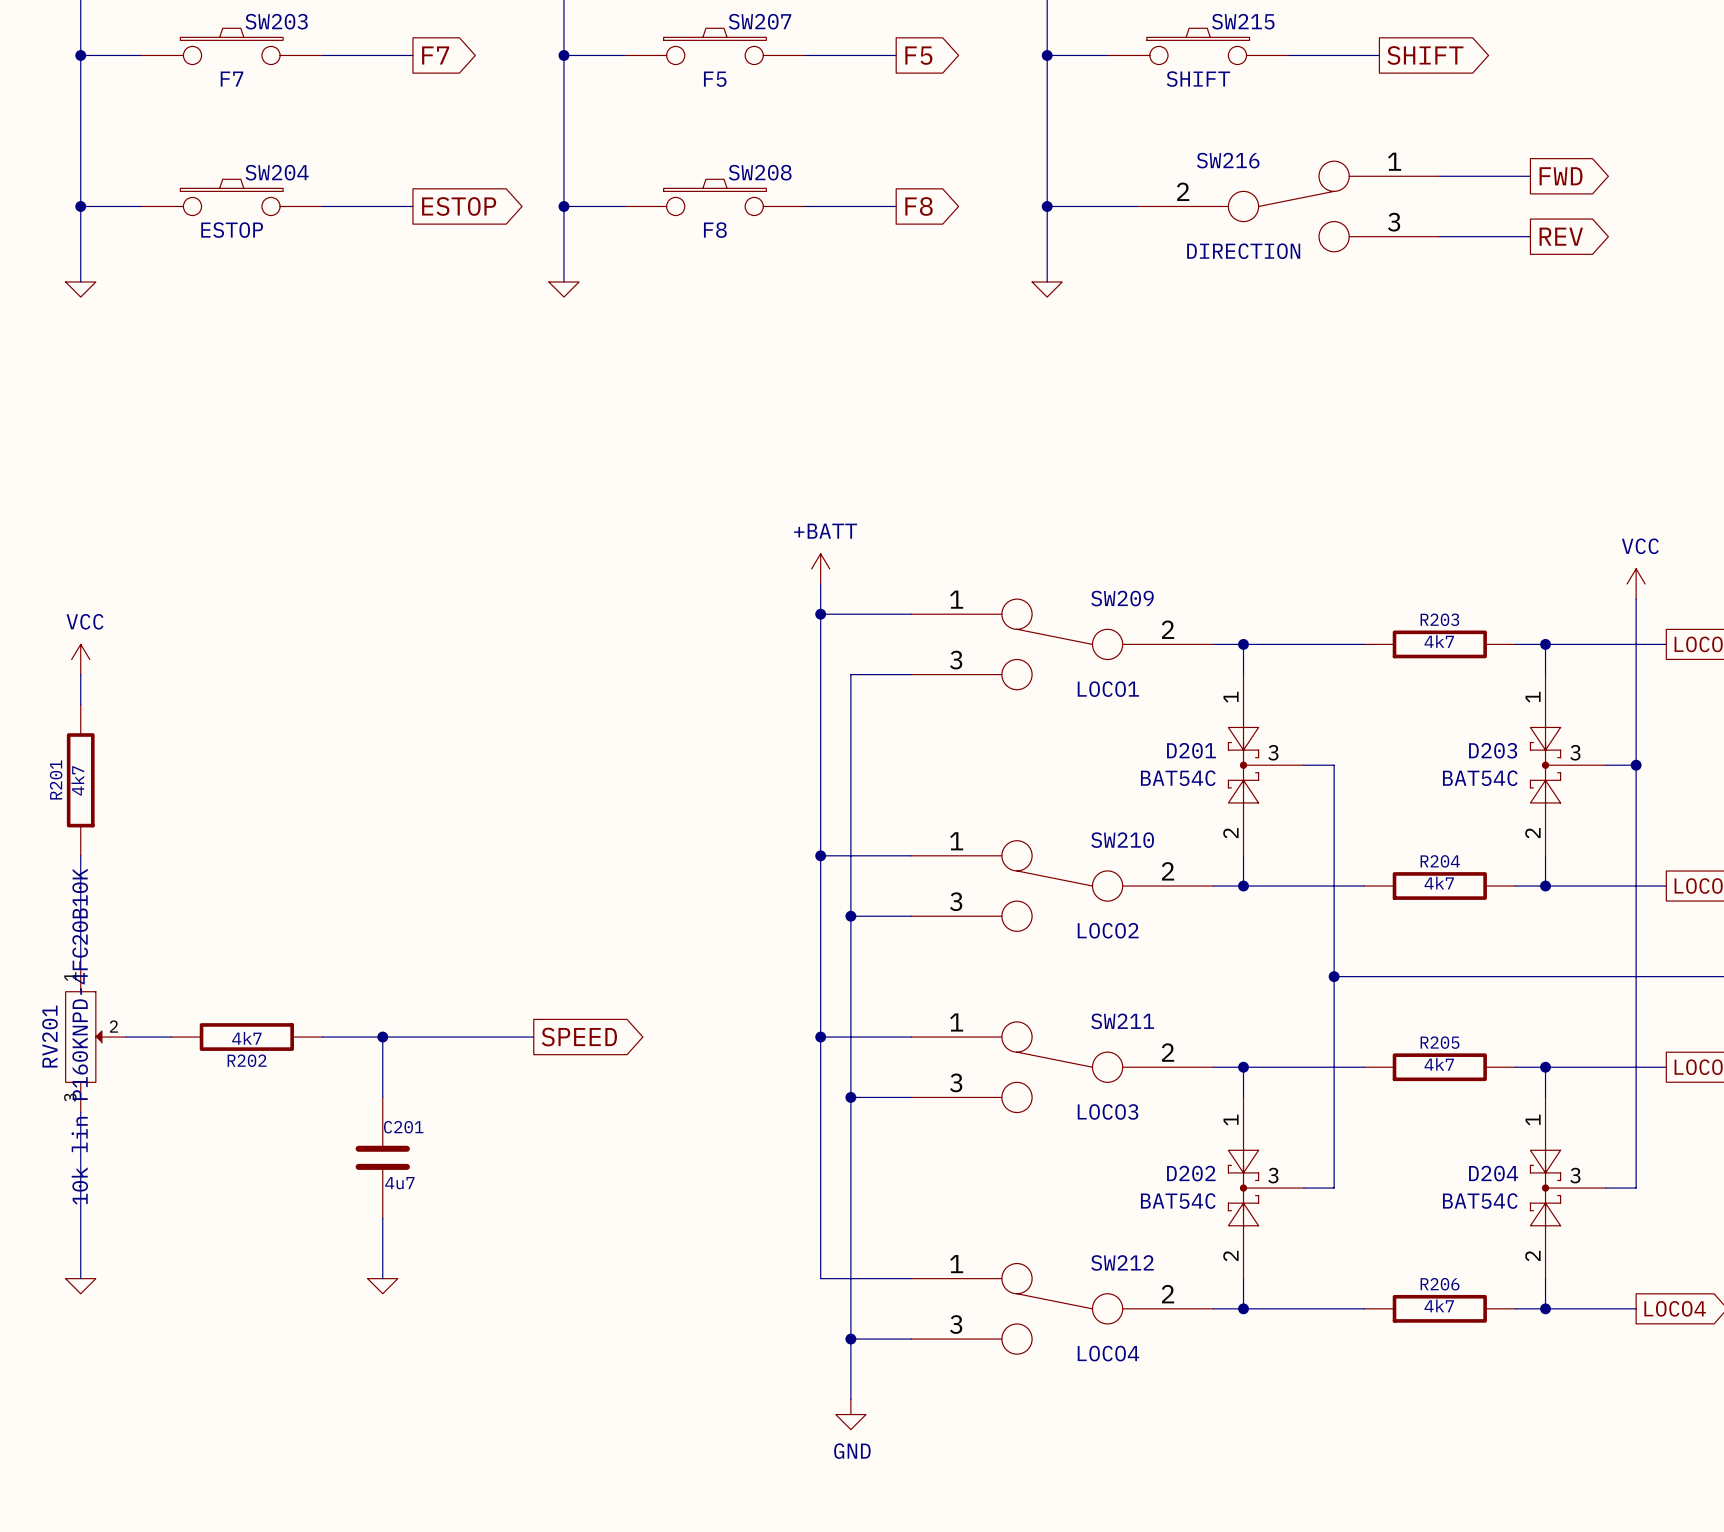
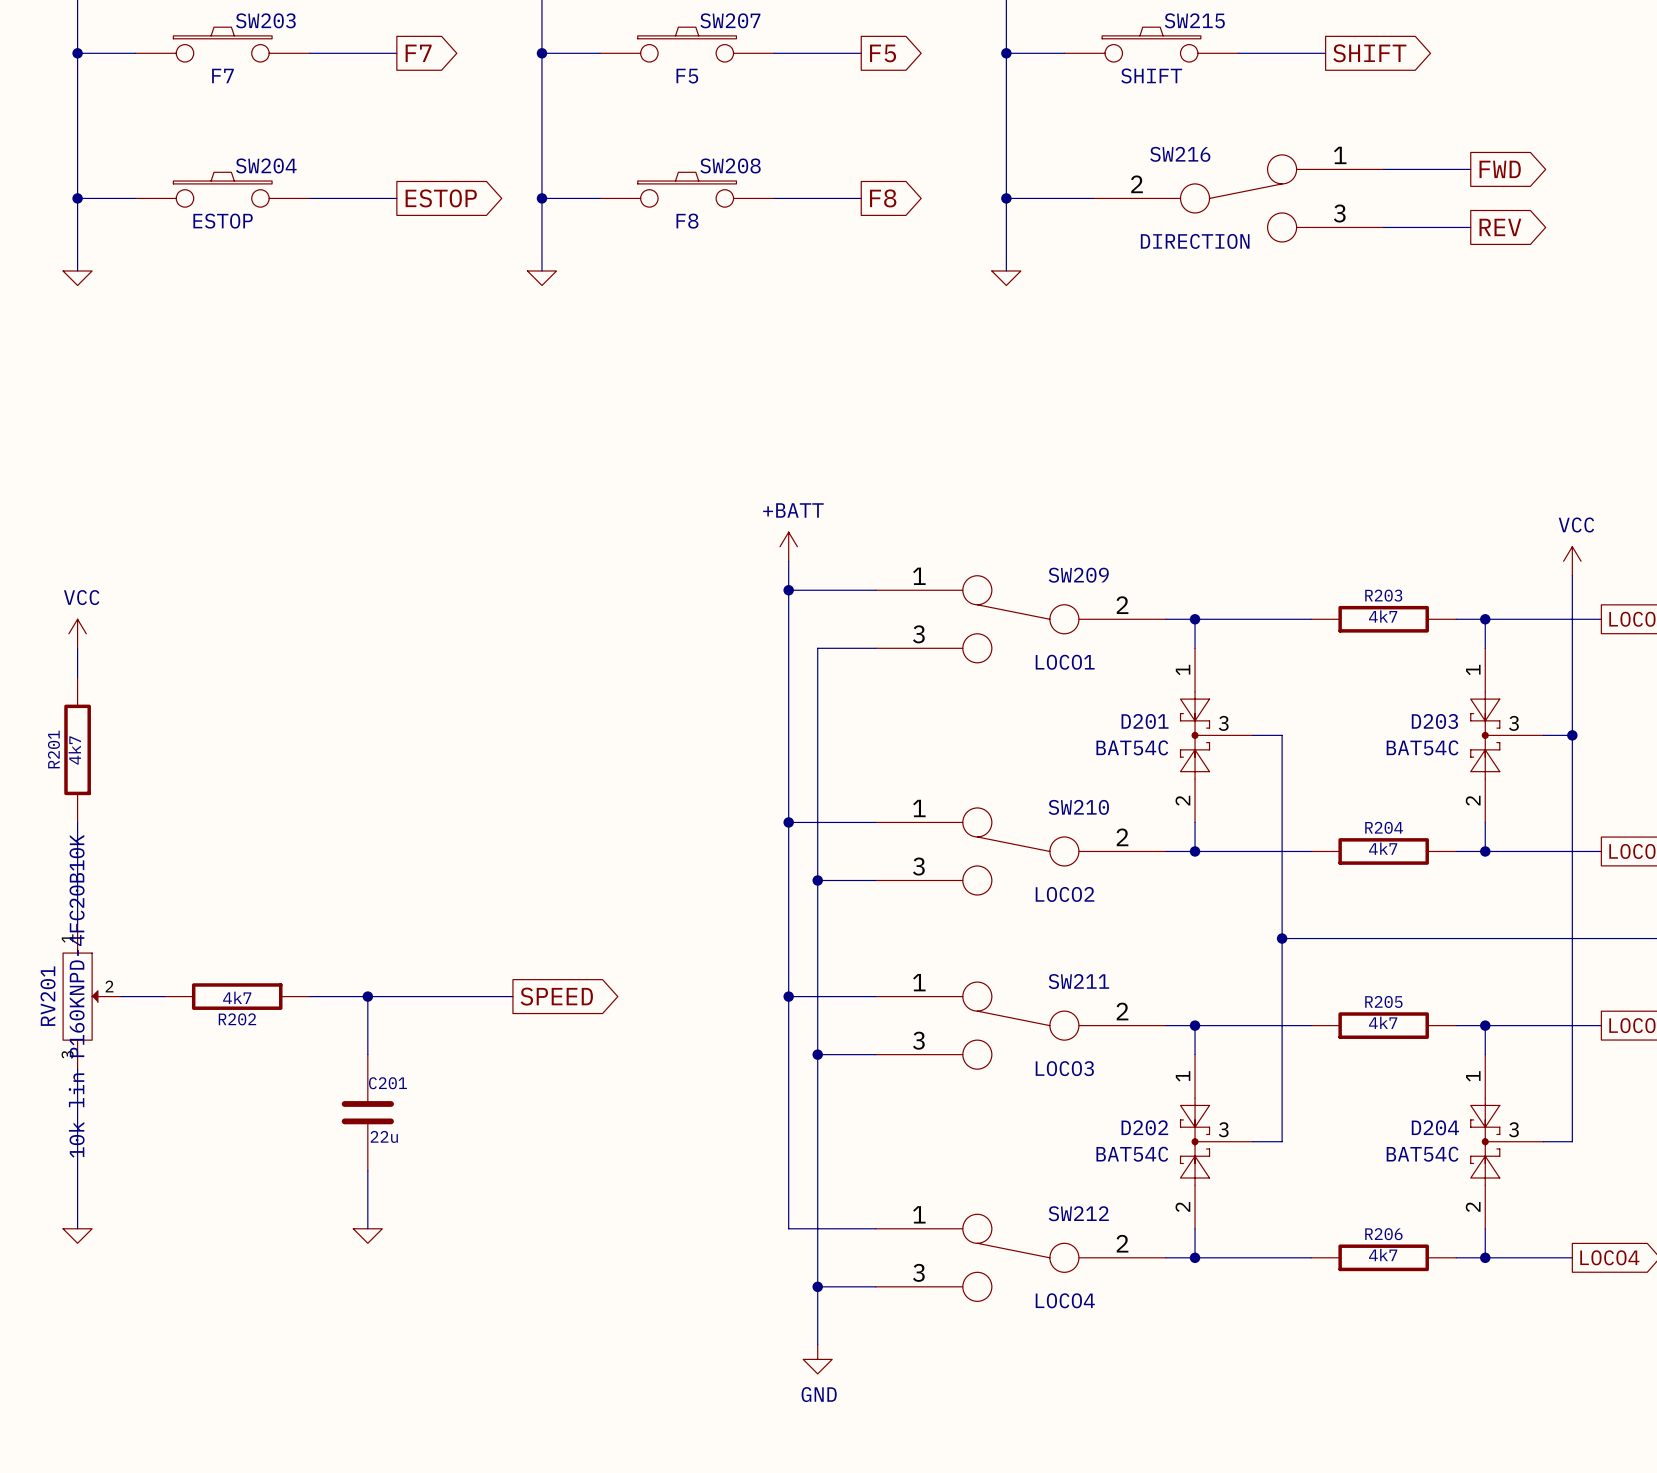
C201 value: 4u7 (399, 1183) -> 22u (384, 1136)

